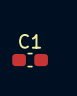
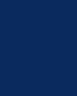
C1: (30, 60) -> none

